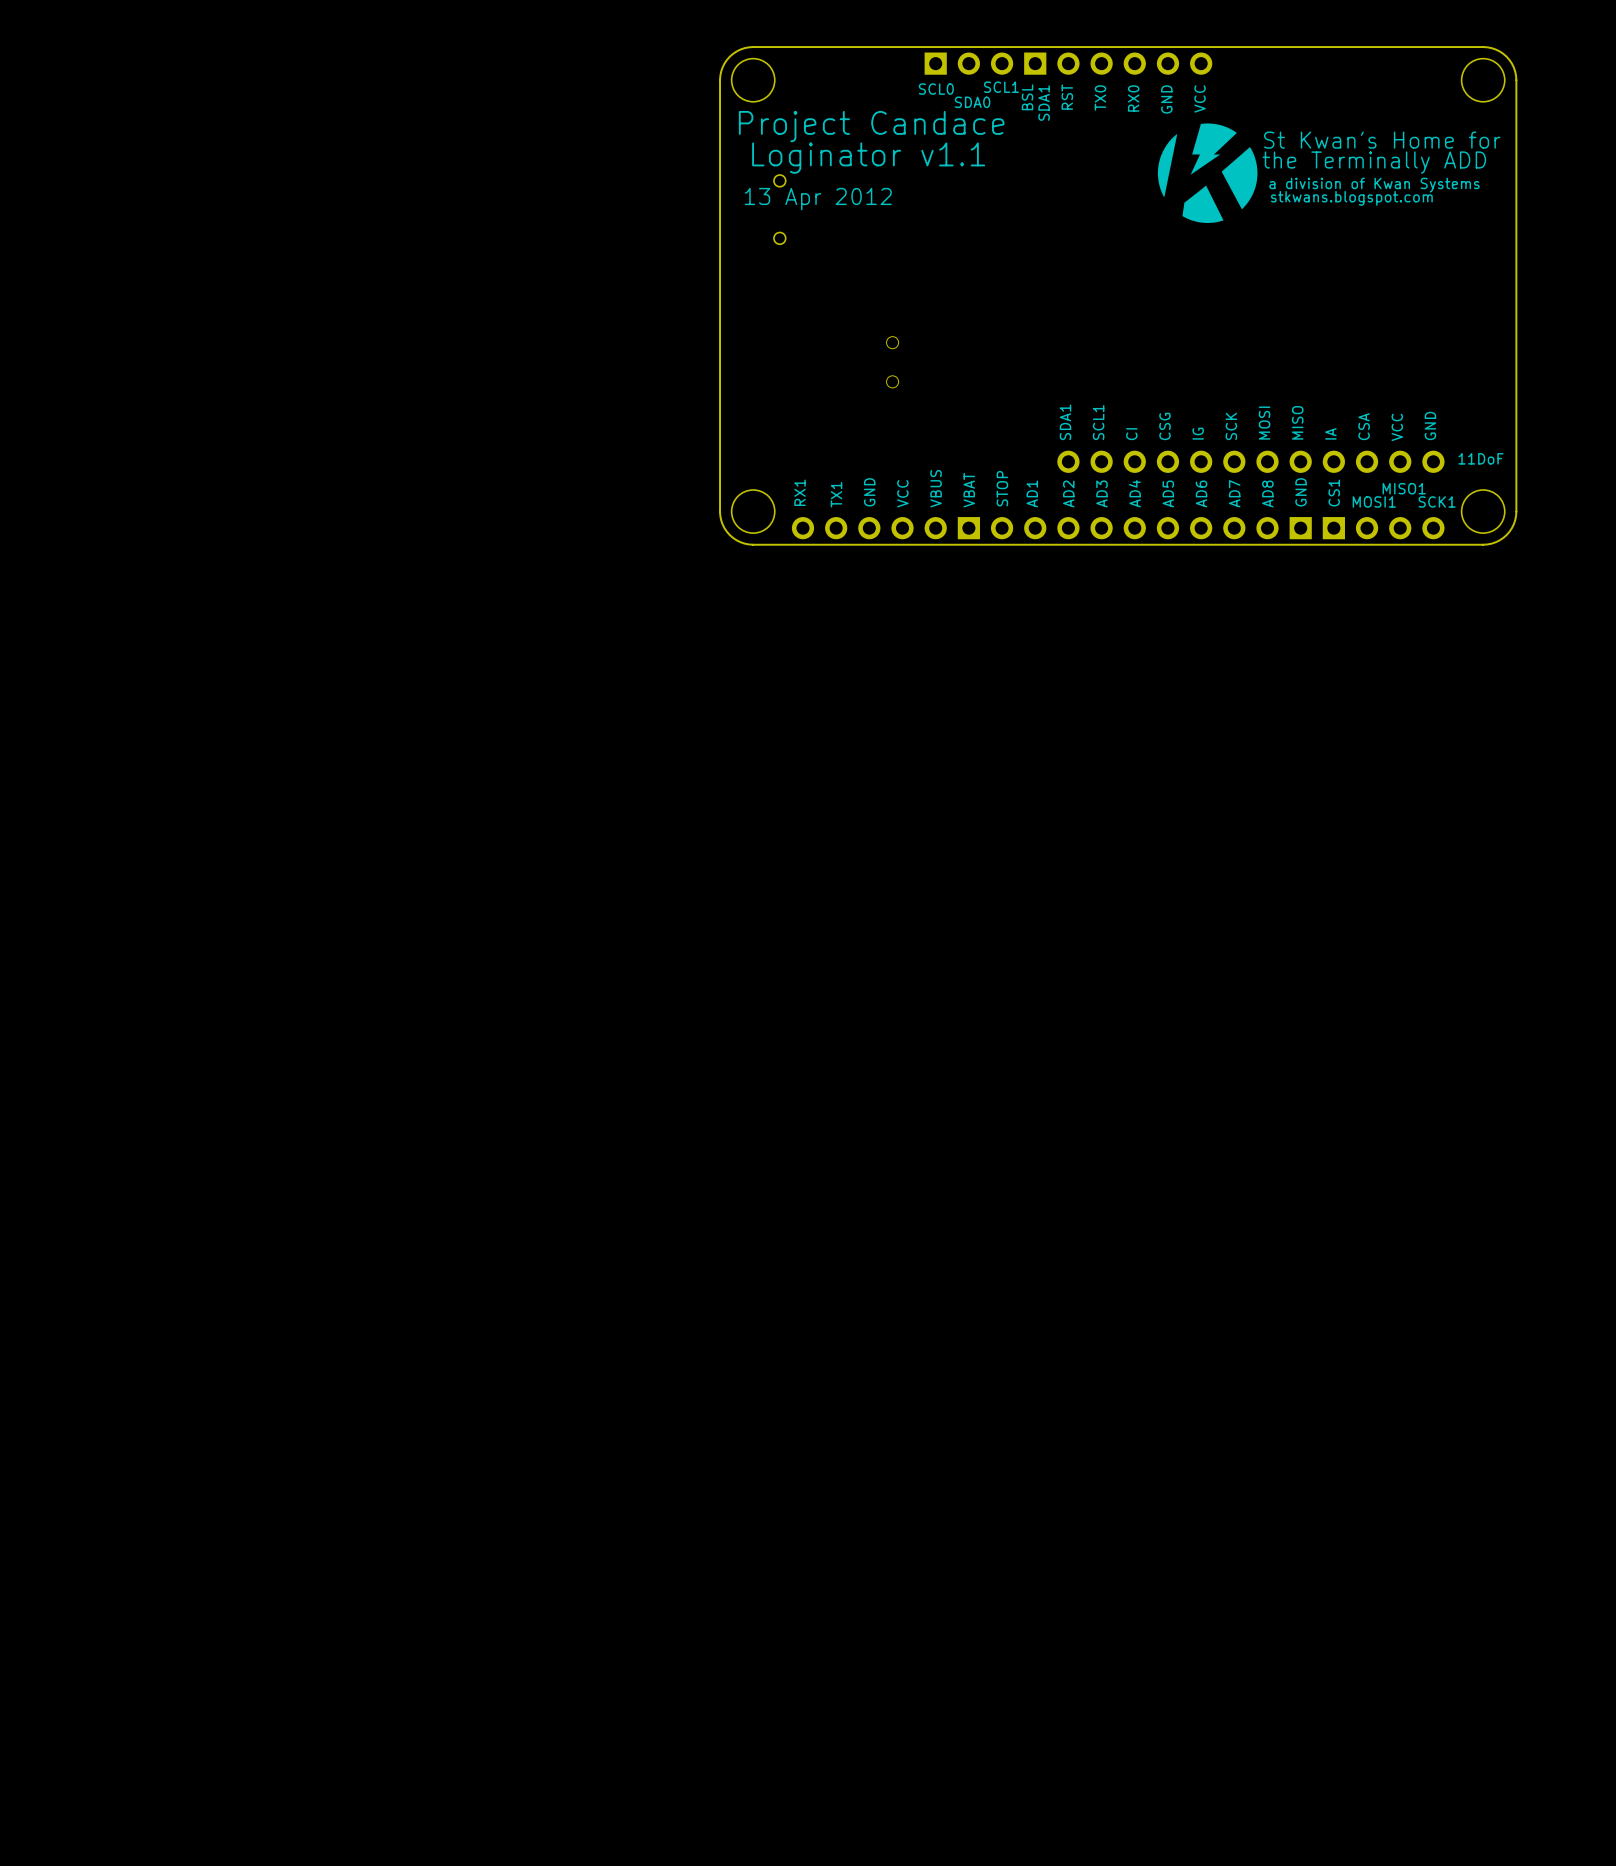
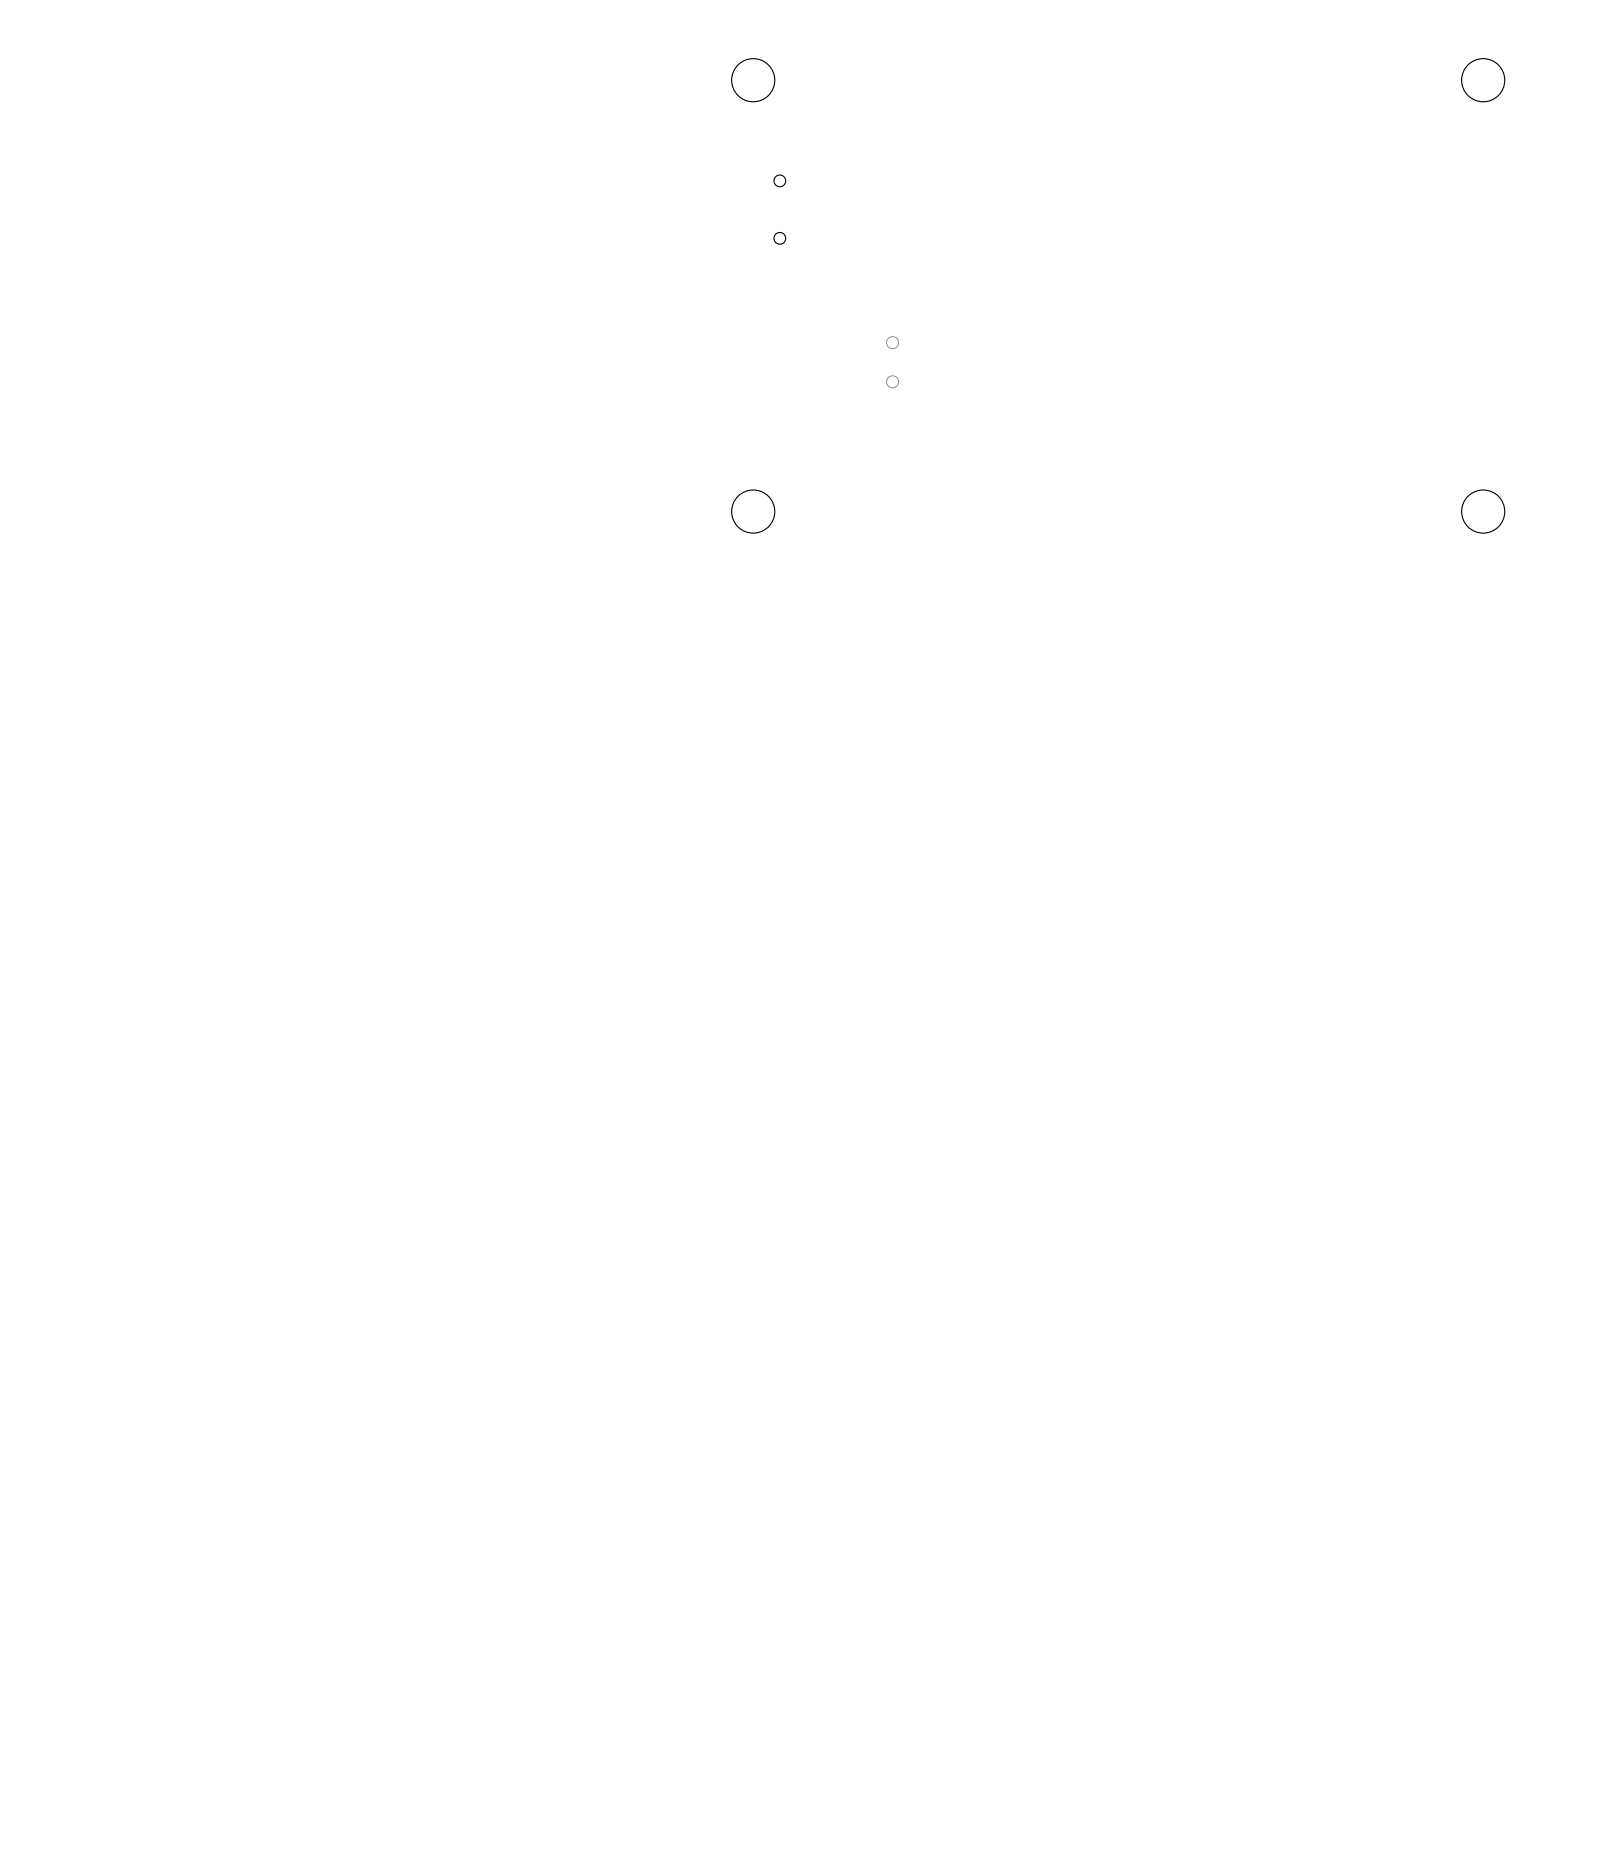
board edge: (1483, 47) (753, 47) (736, 51) (724, 63) (720, 80) (720, 511) (724, 528) (736, 540) (753, 544) (1483, 544) (1499, 540) (1511, 528) (1516, 511) (1516, 80) (1513, 67) (1506, 56) (1495, 49) (1483, 47) -> none
part: (968, 63) -> none
part: (1118, 63) -> none
text: SCL1 (1001, 87) -> none
text: SCL0 (936, 89) -> none
text: BSL (1027, 97) -> none
text: RST (1067, 97) -> none
text: TX0 (1100, 98) -> none
text: RX0 (1133, 98) -> none
text: VCC (1200, 98) -> none
text: GND (1166, 99) -> none
text: SDA0 (972, 102) -> none
text: SDA1 (1044, 103) -> none
drawing: [1157, 123, 1258, 223] -> none
text: Project Candace (871, 126) -> none
text: St Kwan's Home for (1382, 140) -> none
text: Loginator v1.1 (868, 158) -> none
text: the Terminally ADD (1374, 162) -> none
text: a division of Kwan Systems (1374, 185) -> none
text: stkwans.blogspot.com (1351, 198) -> none
text: 13 Apr 2012 (818, 199) -> none
text: SDA1 (1065, 422) -> none
text: SCL1 (1098, 422) -> none
text: MISO (1297, 422) -> none
text: MOSI (1264, 423) -> none
text: GND (1430, 425) -> none
text: CSG (1165, 426) -> none
text: SCK (1231, 426) -> none
text: CSA (1364, 426) -> none
text: VCC (1397, 427) -> none
text: IG (1198, 433) -> none
text: IA (1330, 433) -> none
text: CI (1131, 434) -> none
text: 11DoF (1480, 458) -> none
part: (1250, 461) -> none
text: VBUS (936, 488) -> none
text: STOP (1002, 488) -> none
text: MISO1 (1404, 488) -> none
text: VBAT (969, 490) -> none
text: RX1 (800, 492) -> none
text: GND (869, 492) -> none
text: GND (1301, 492) -> none
text: VCC (902, 493) -> none
text: AD1 (1032, 493) -> none
text: AD2 (1068, 493) -> none
text: AD3 (1101, 493) -> none
text: AD4 (1134, 493) -> none
text: AD5 (1168, 493) -> none
text: AD6 (1201, 493) -> none
text: AD7 (1234, 493) -> none
text: AD8 (1267, 493) -> none
text: CS1 (1334, 493) -> none
text: TX1 (836, 494) -> none
text: MOSI1 (1374, 501) -> none
text: SCK1 (1437, 501) -> none
part: (885, 528) -> none
part: (1151, 528) -> none
part: (1383, 528) -> none

